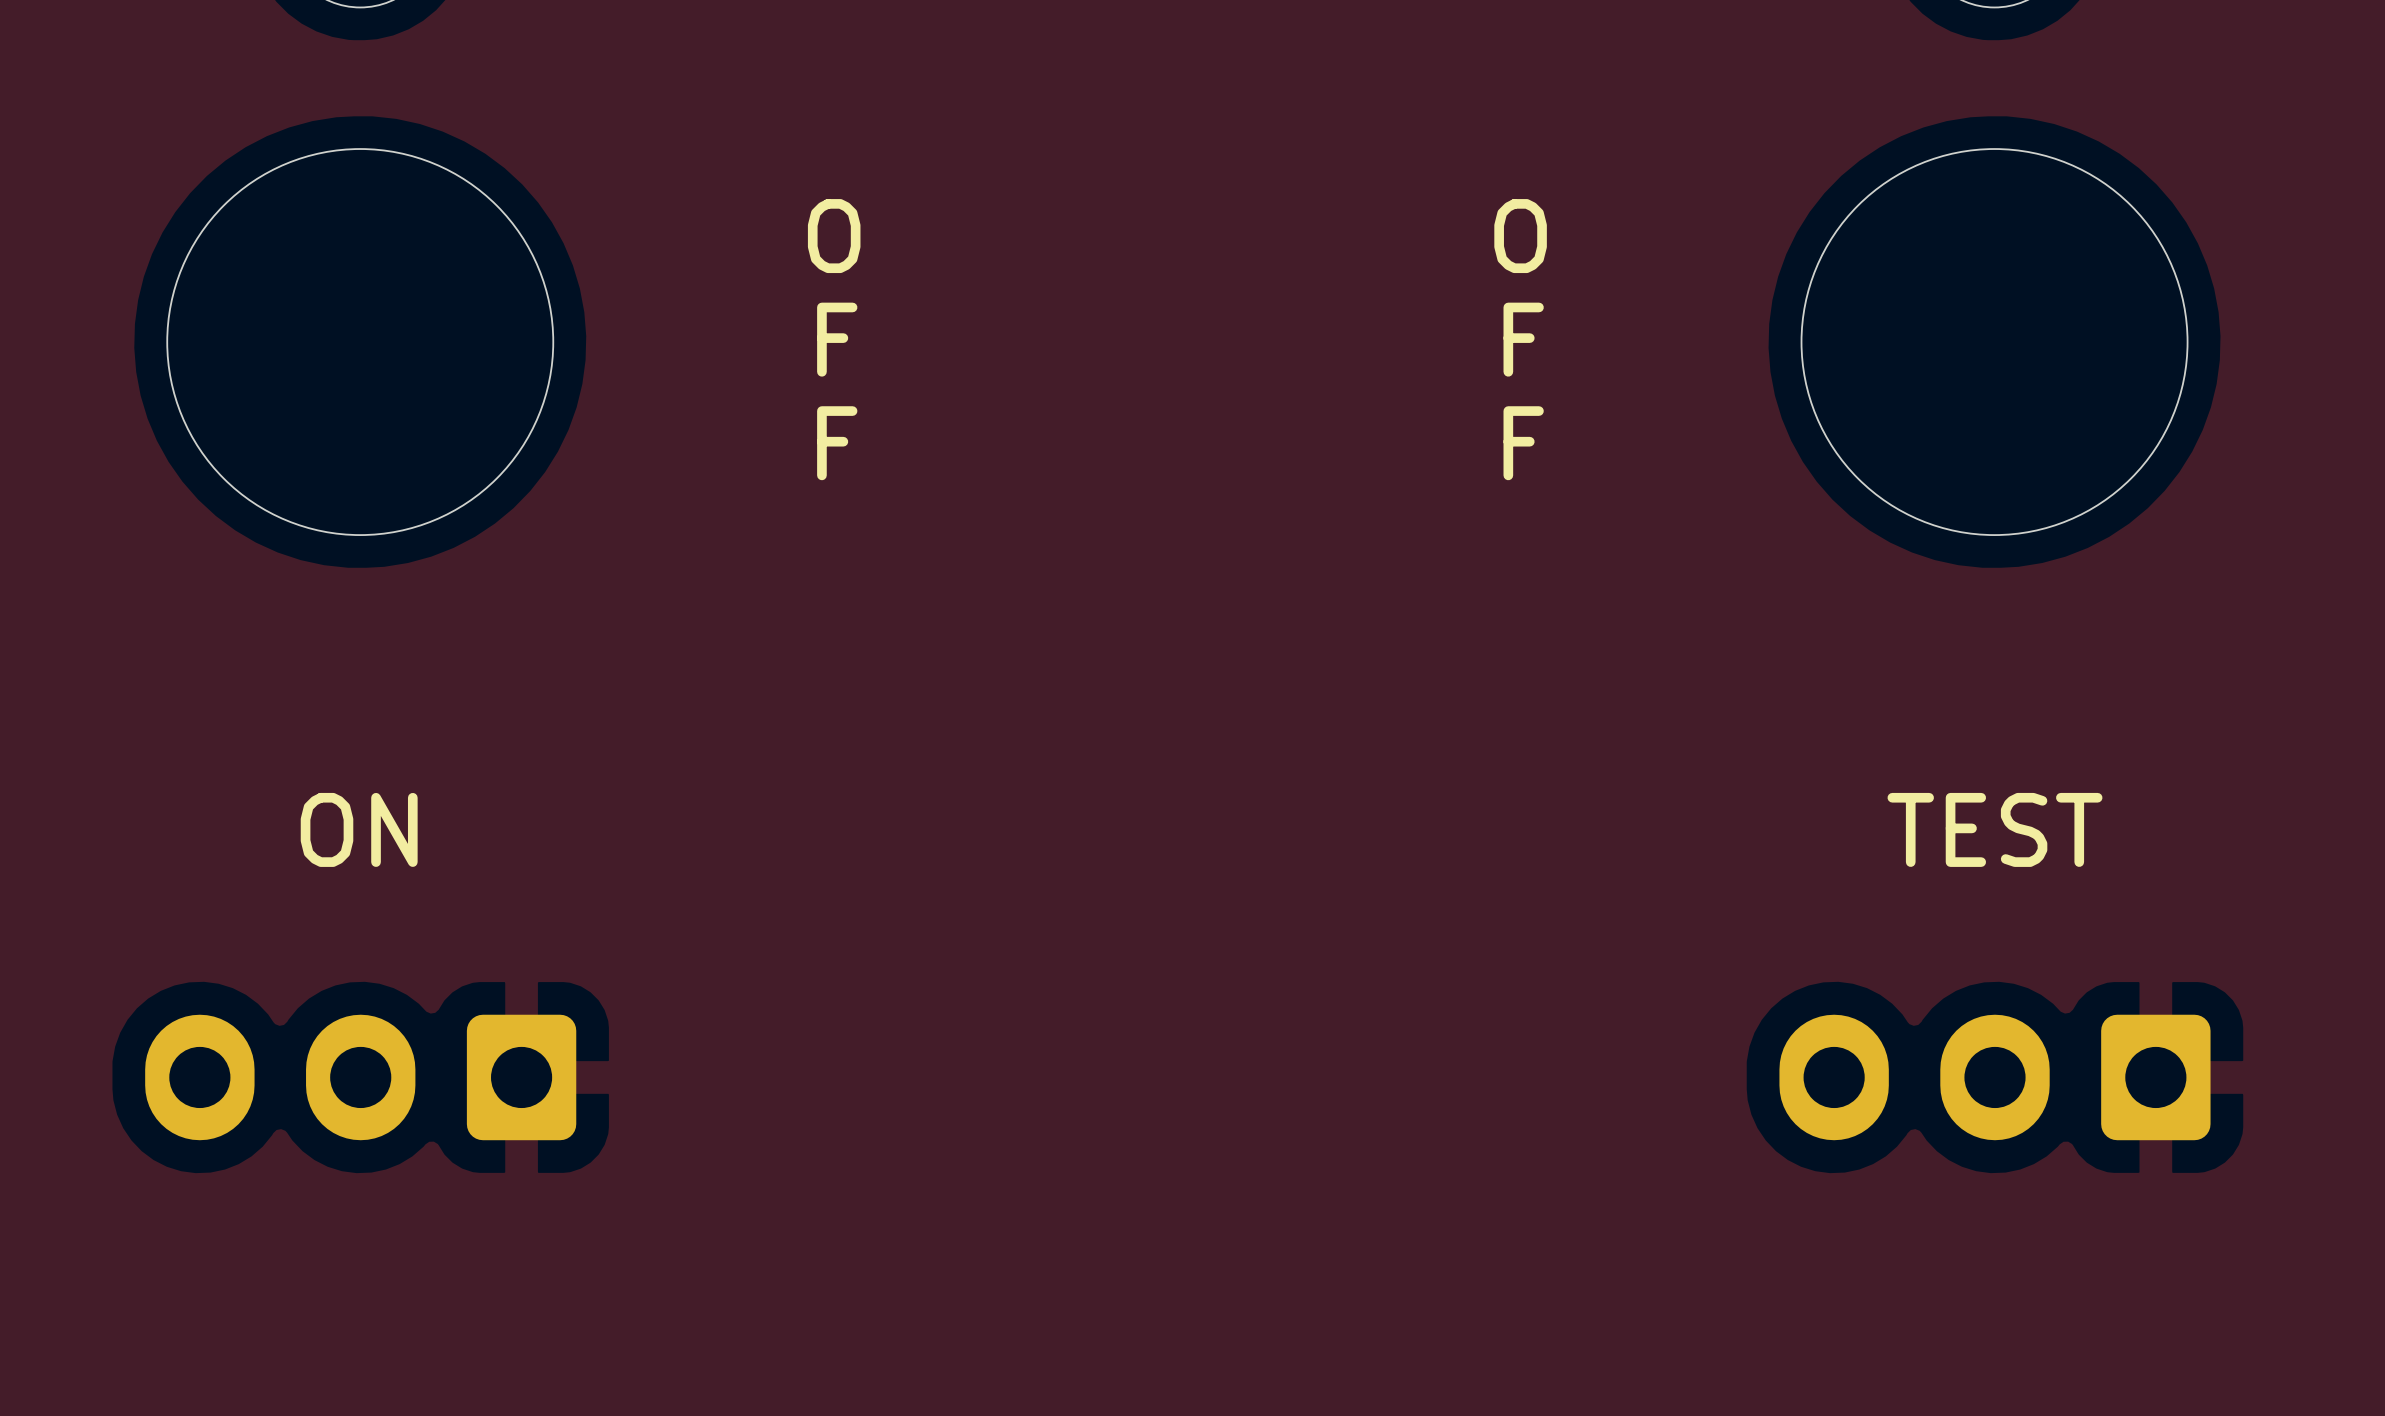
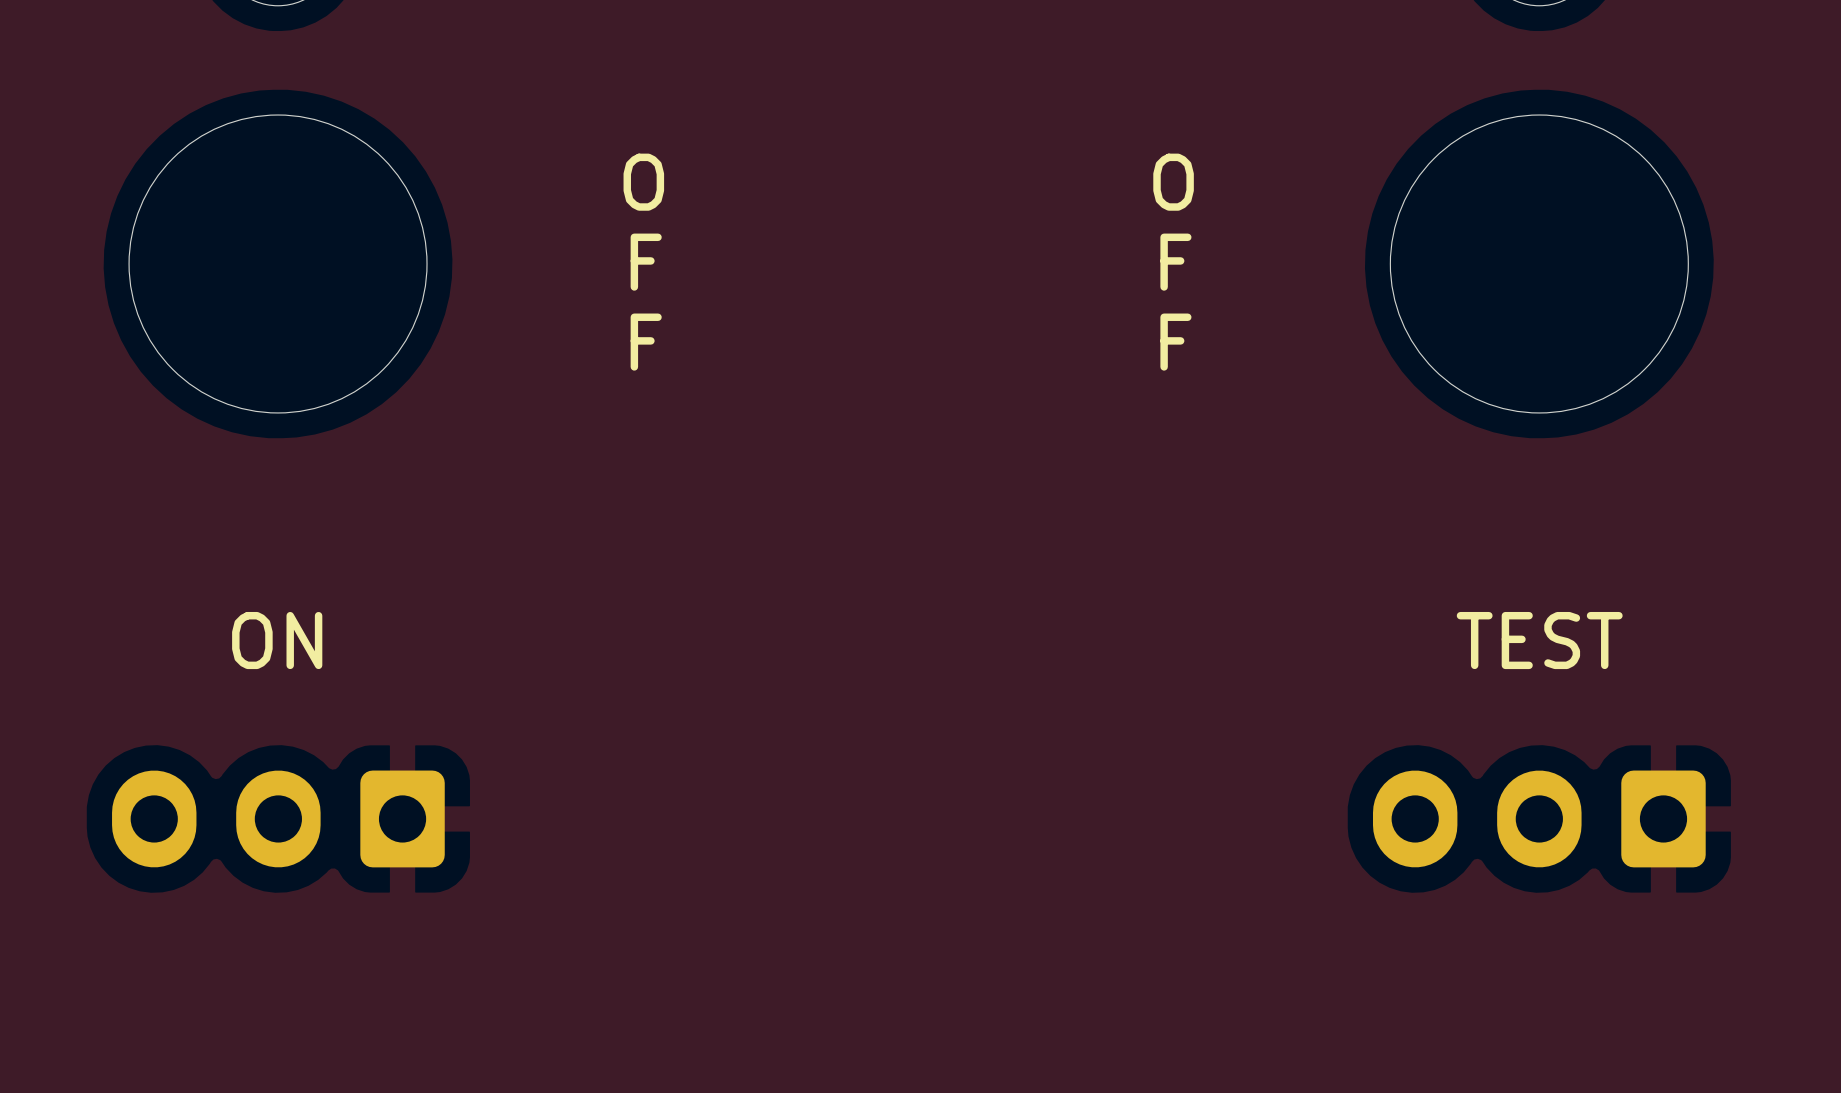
part position: (360, 1077) -> (278, 818)
part position: (1994, 1077) -> (1539, 818)

